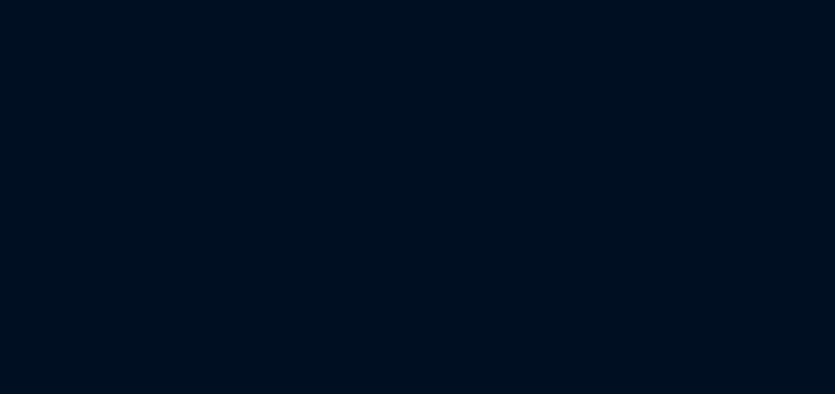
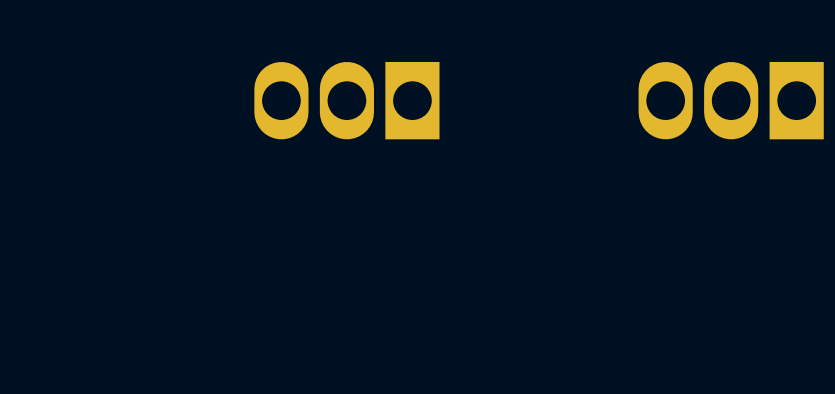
part: none -> (346, 100)
part: none -> (731, 100)

